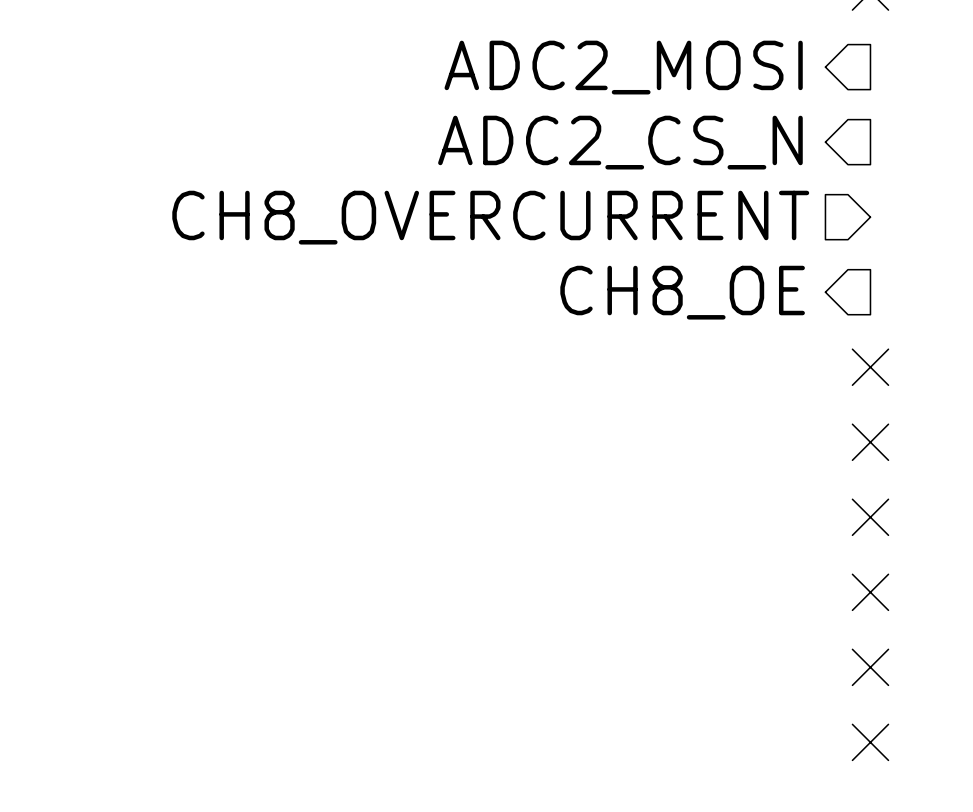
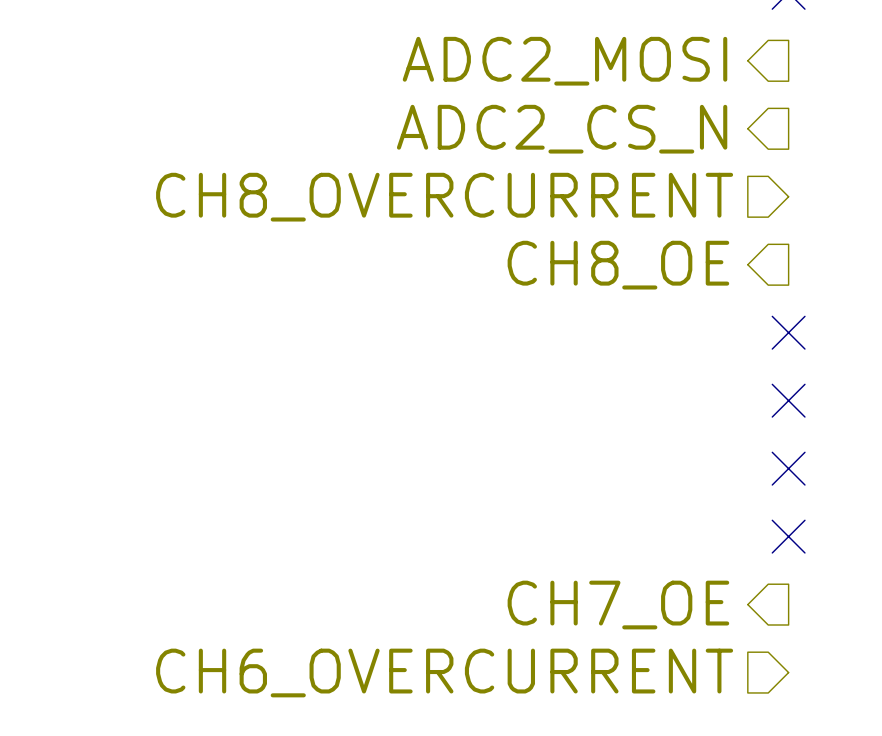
hierarchical label: none -> CH7_OE (618, 605)
no-connect mark: (870, 667) -> none
hierarchical label: none -> CH6_OVERCURRENT (444, 673)
no-connect mark: (870, 742) -> none

